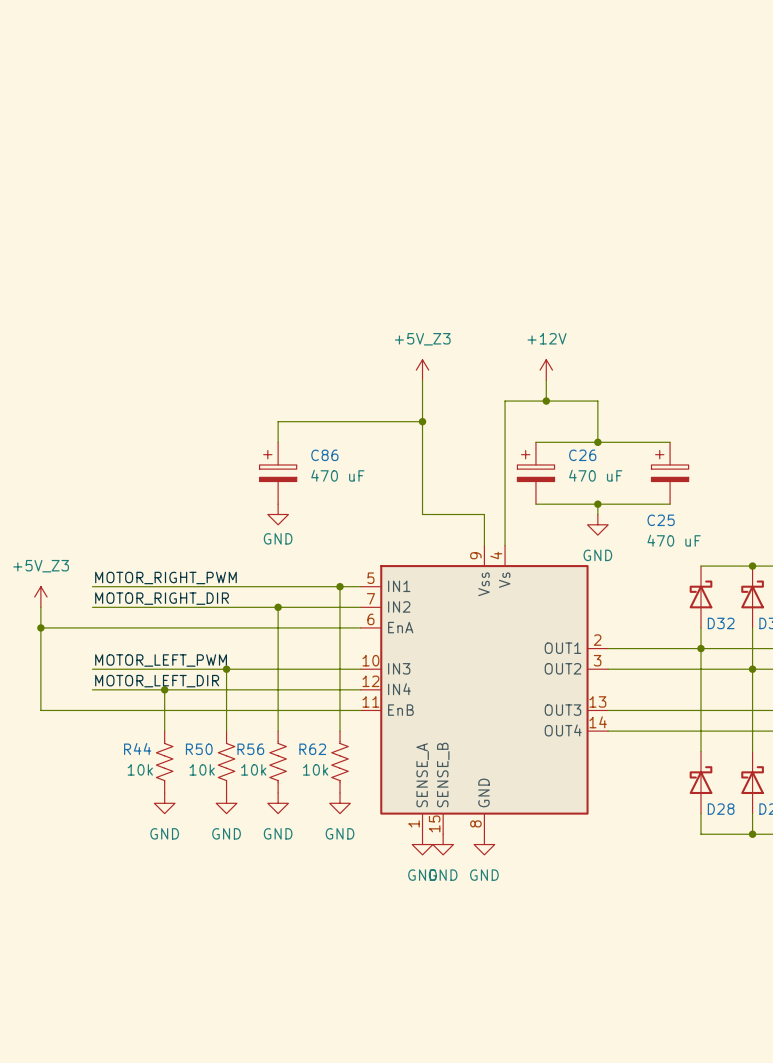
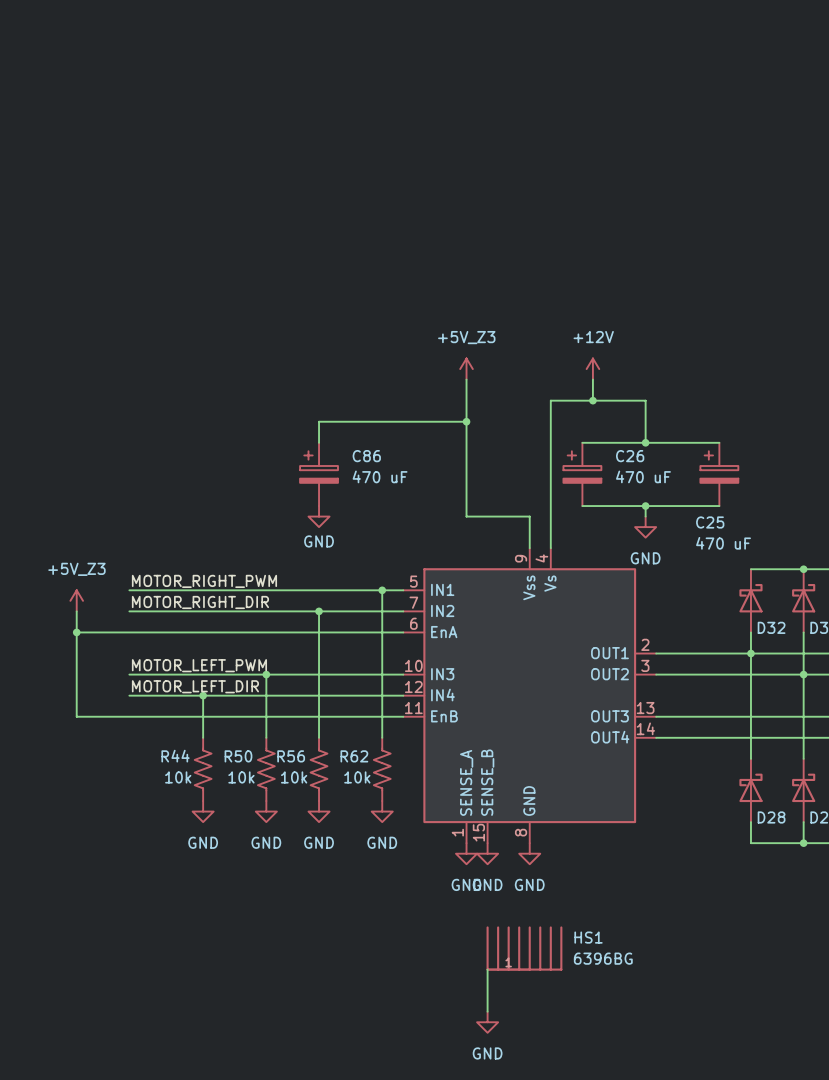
HS1: none -> 6396BG (524, 948)
wire: none -> (487, 969) (487, 1011)
power symbol: none -> GND (487, 1022)

